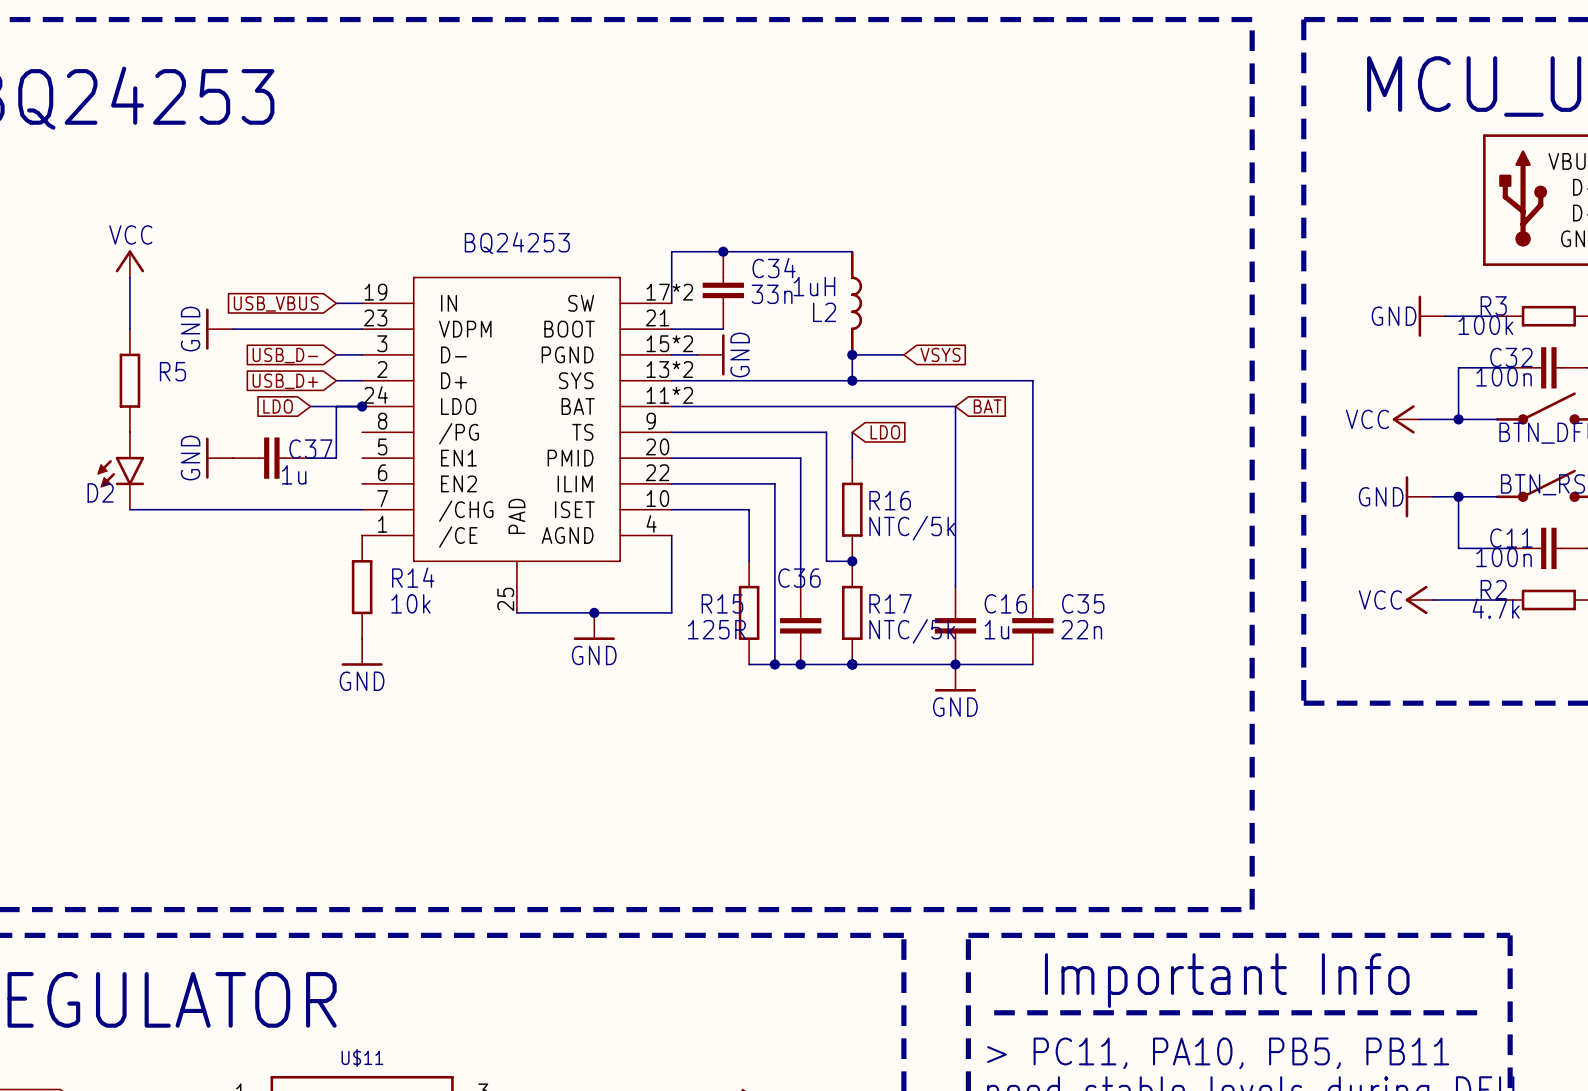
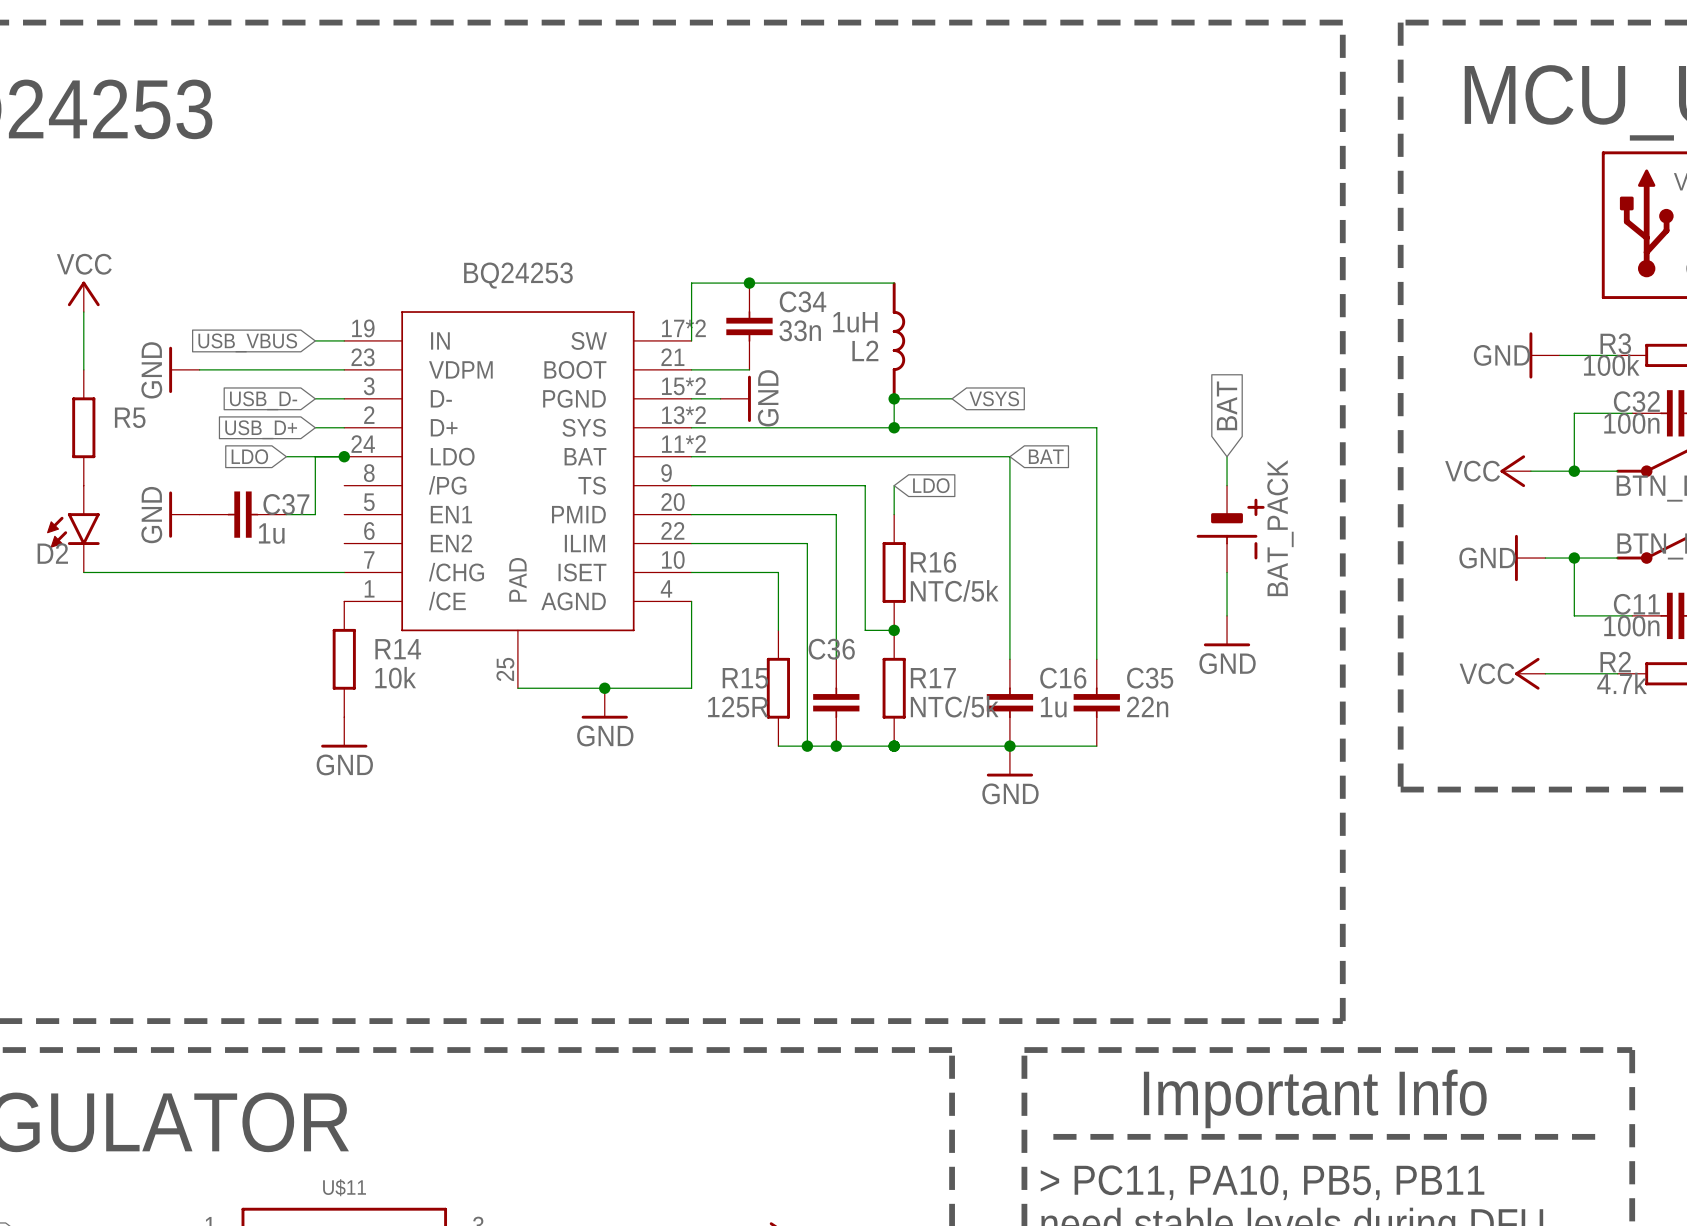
global label: none -> BAT (1227, 405)
wire: none -> (1227, 456) (1227, 485)
BAT_PACK: none -> (1230, 529)
wire: none -> (1227, 572) (1227, 615)
power symbol: none -> GND (1227, 631)

